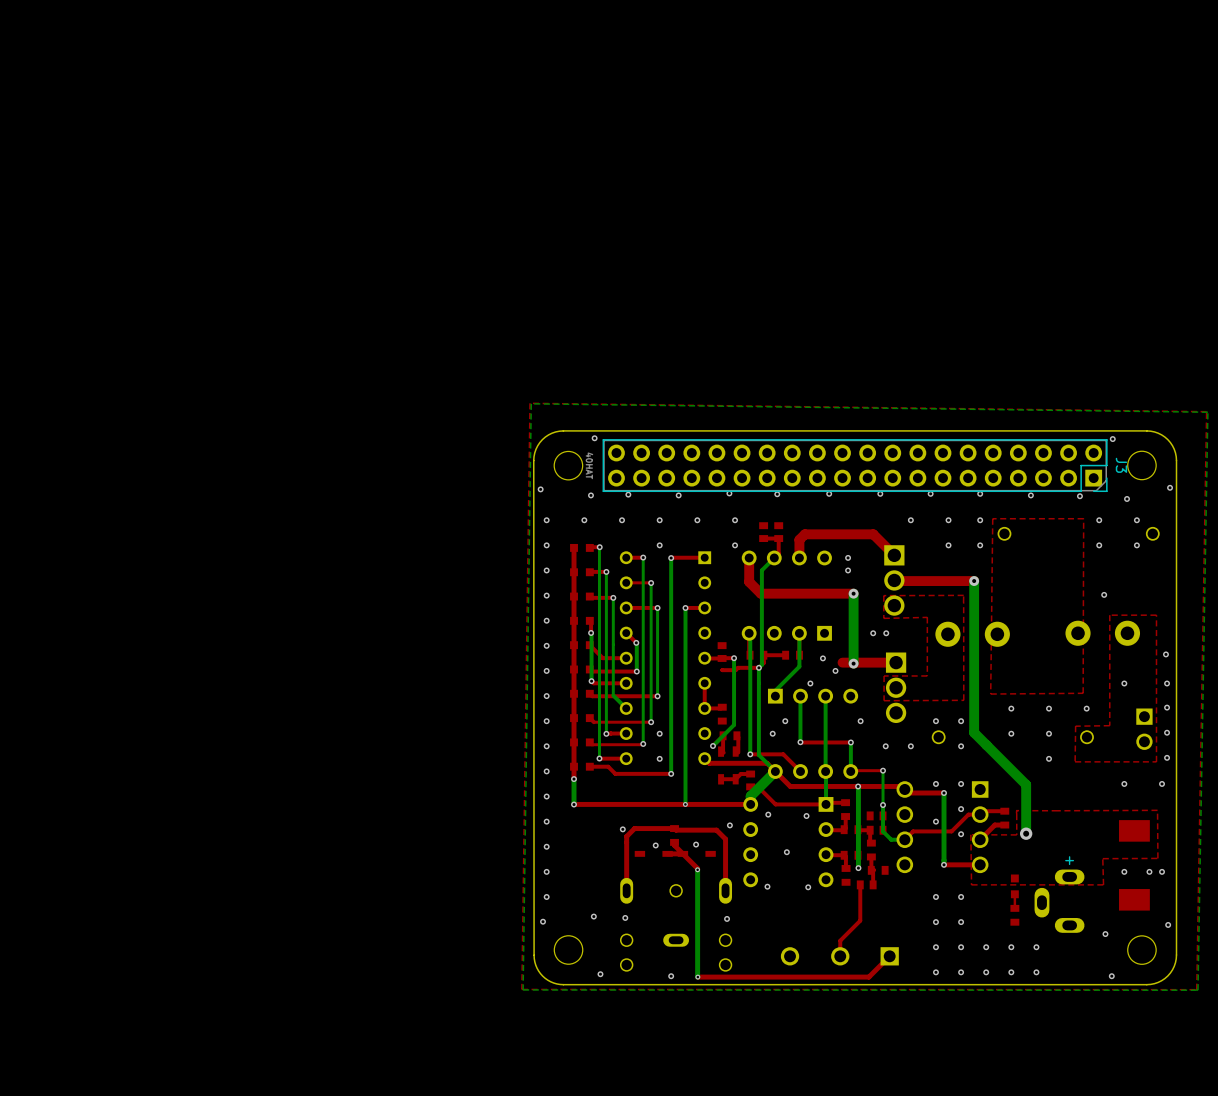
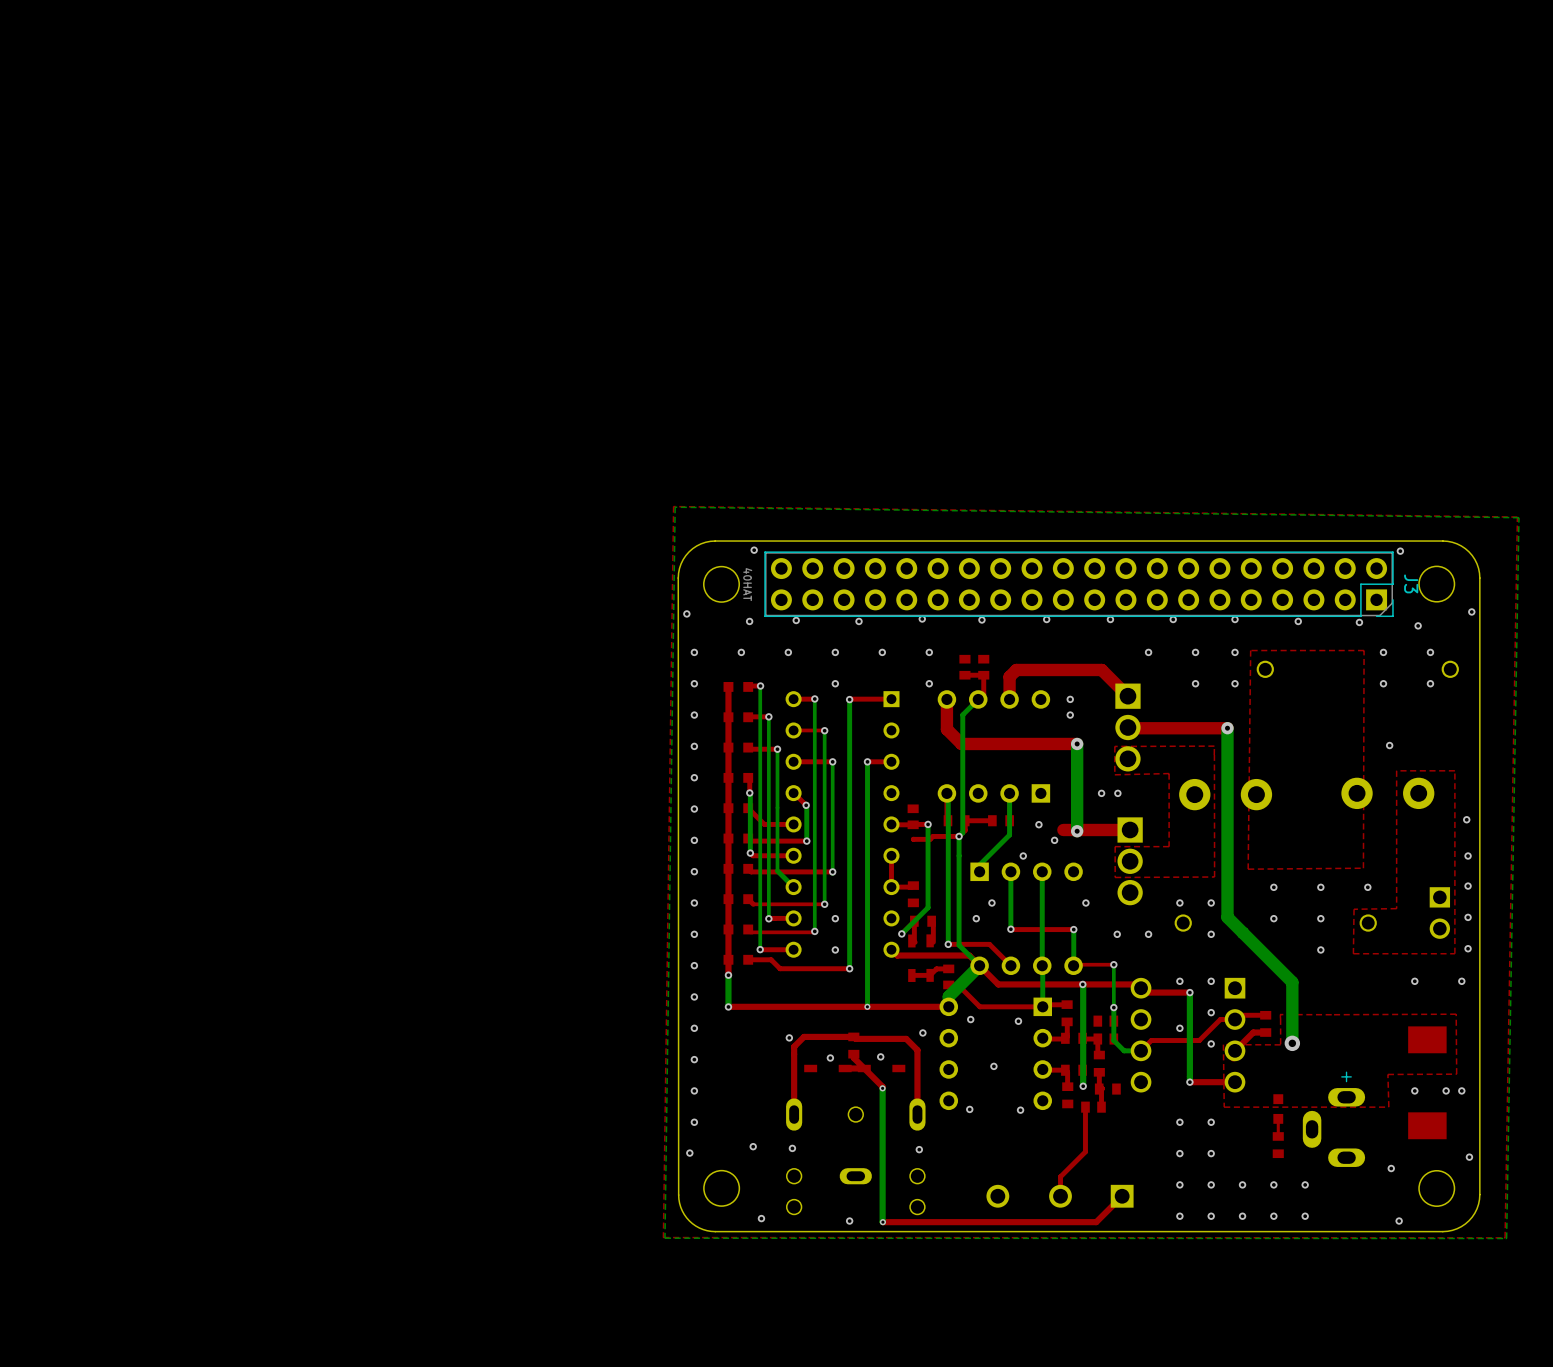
via: (1124, 683) -> none

